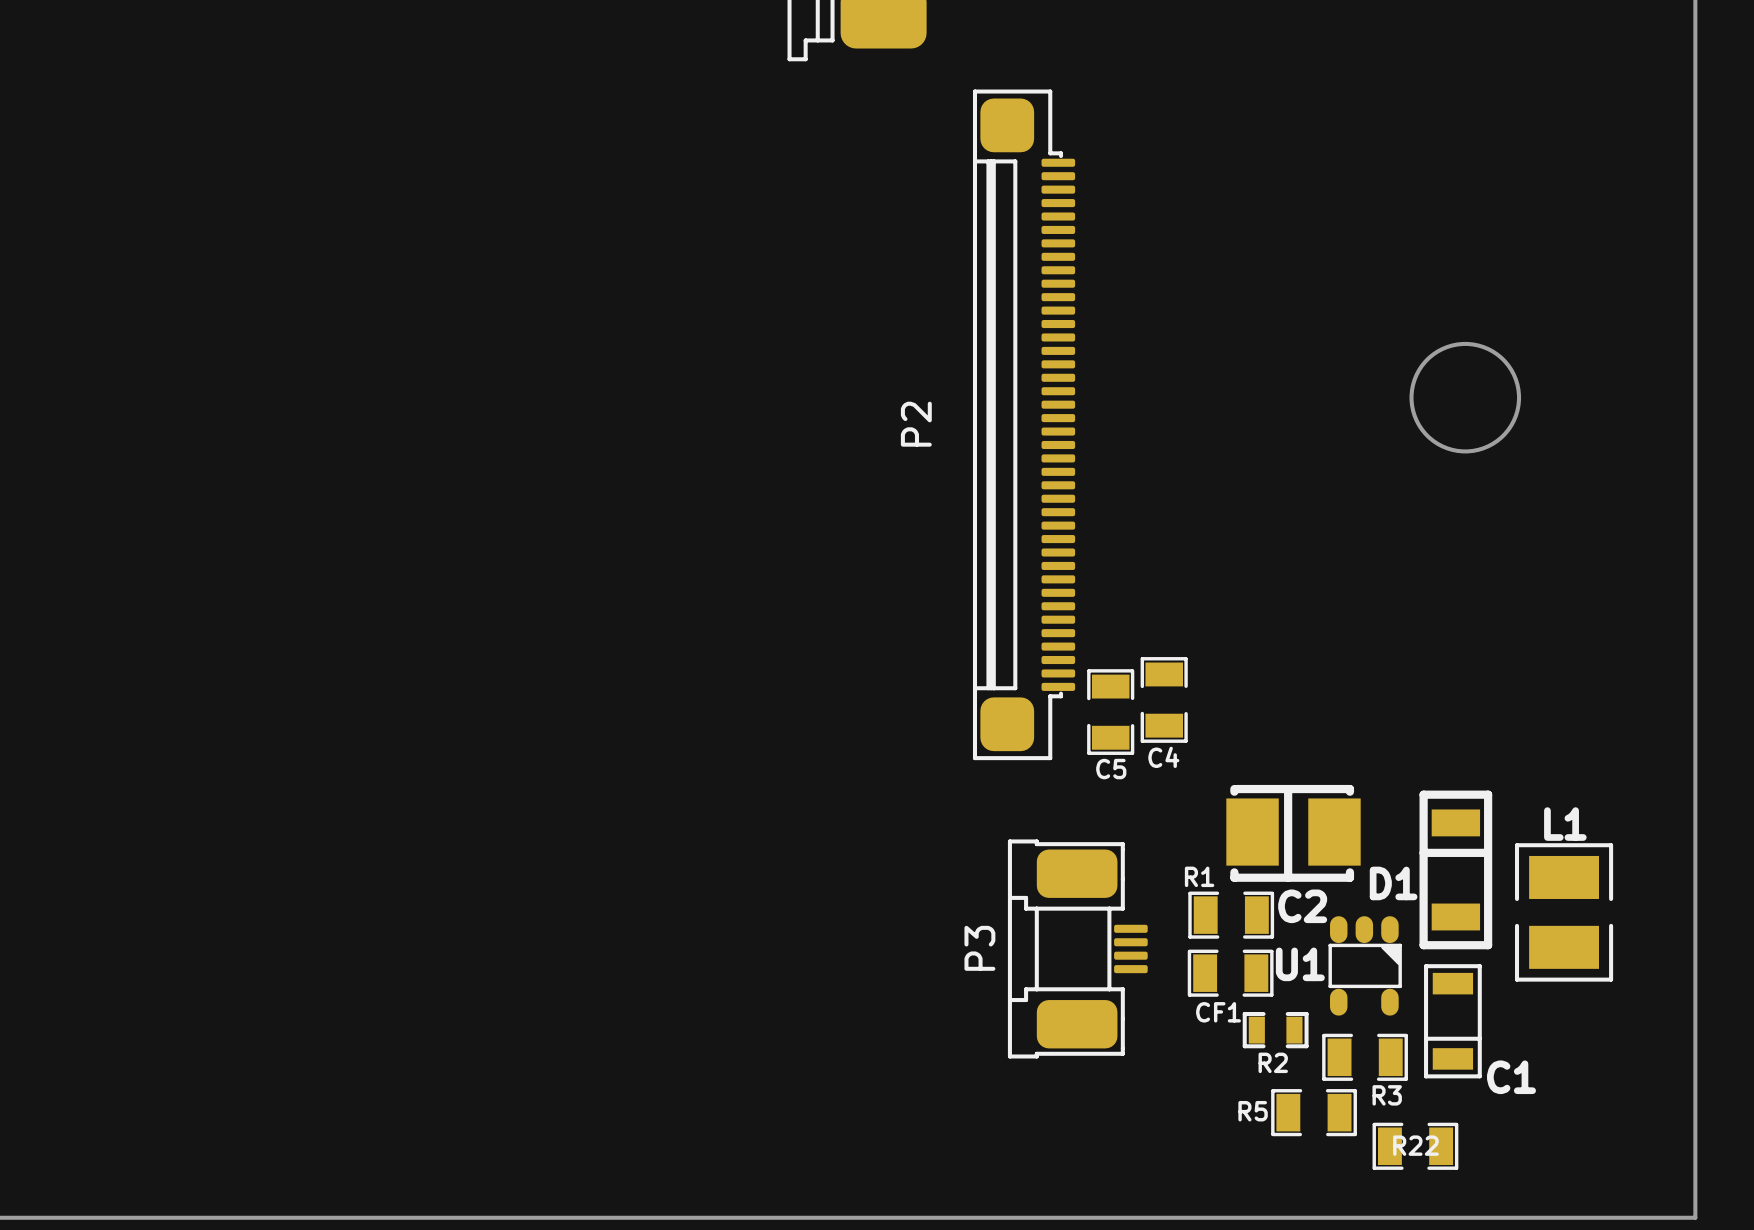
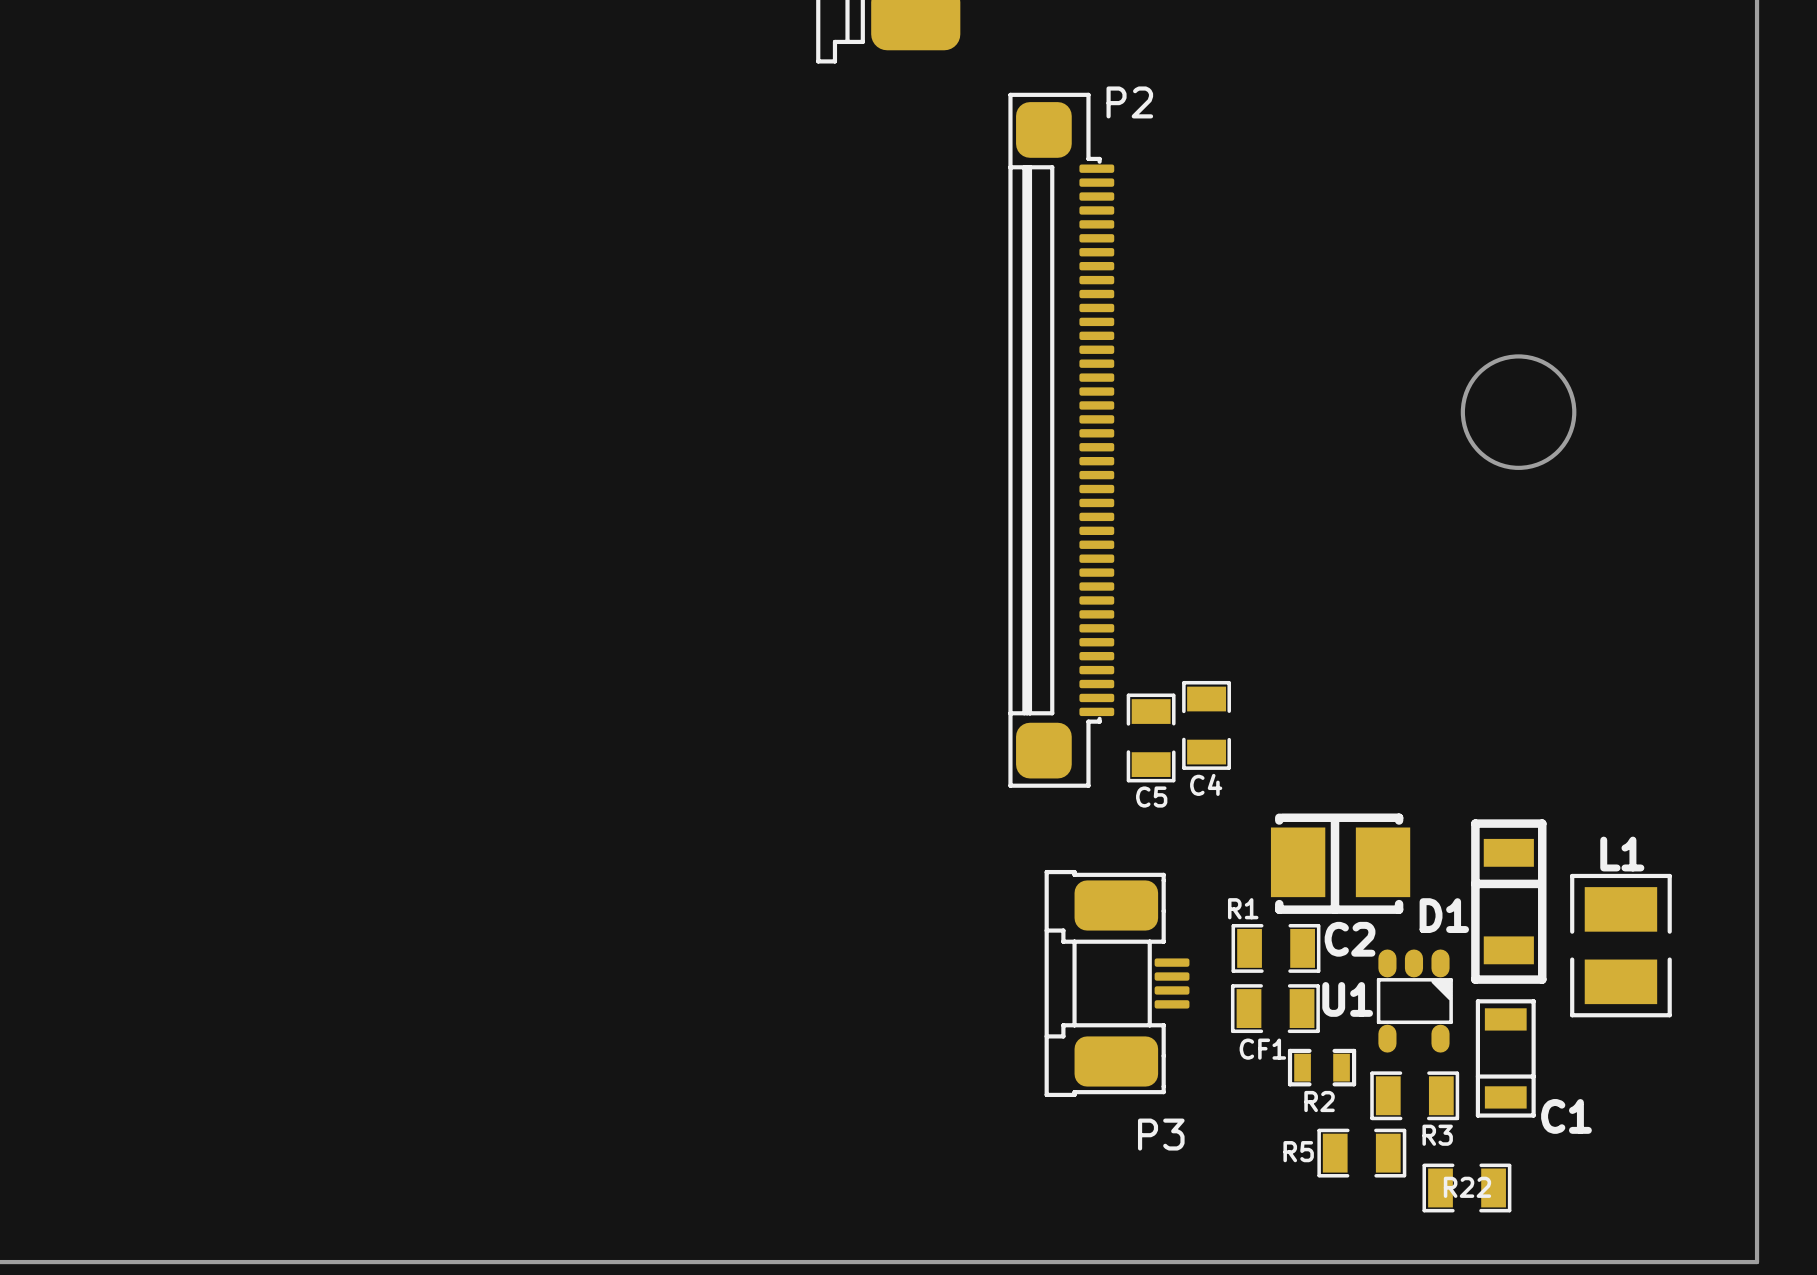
P2 name rotation: 0° (916, 424) -> 90° clockwise (1129, 102)
P2 name position: P2 (916, 424) -> P2 (1129, 102)
P3 name rotation: 0° (979, 948) -> 90° clockwise (1161, 1134)
P3 name position: P3 (979, 948) -> P3 (1161, 1134)

